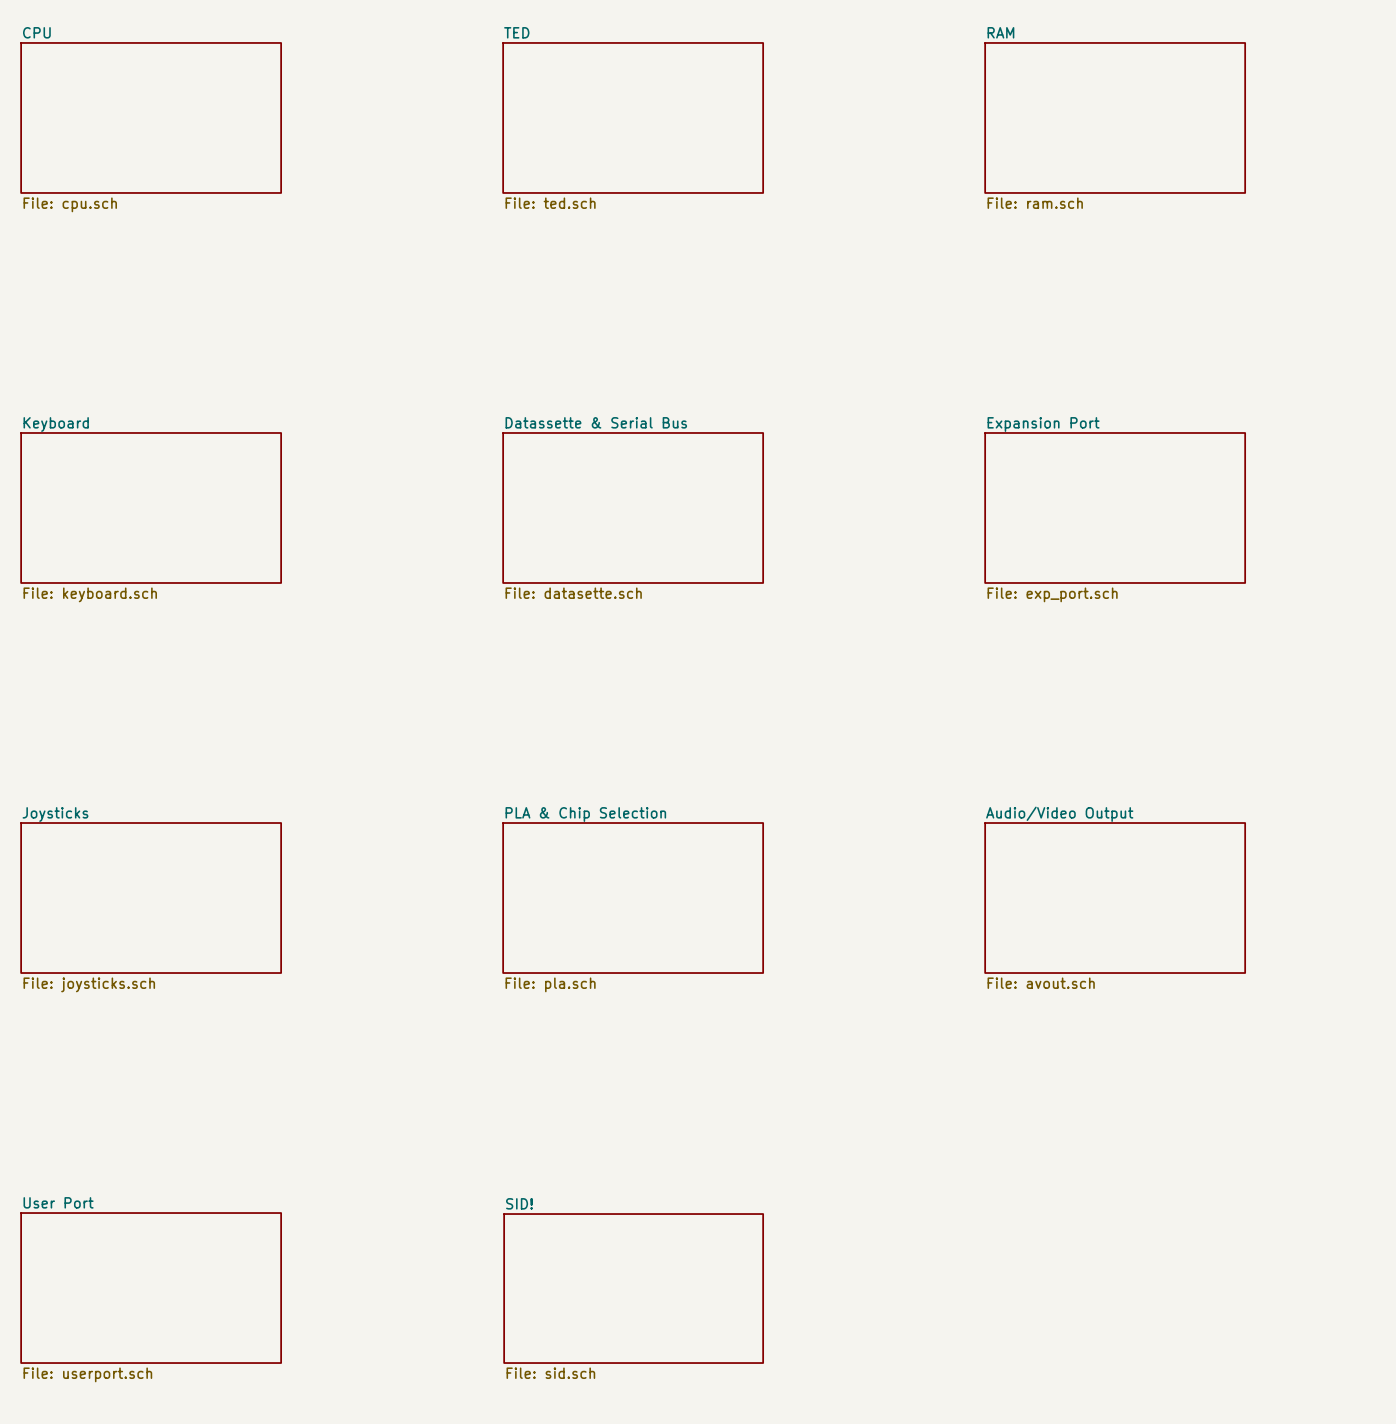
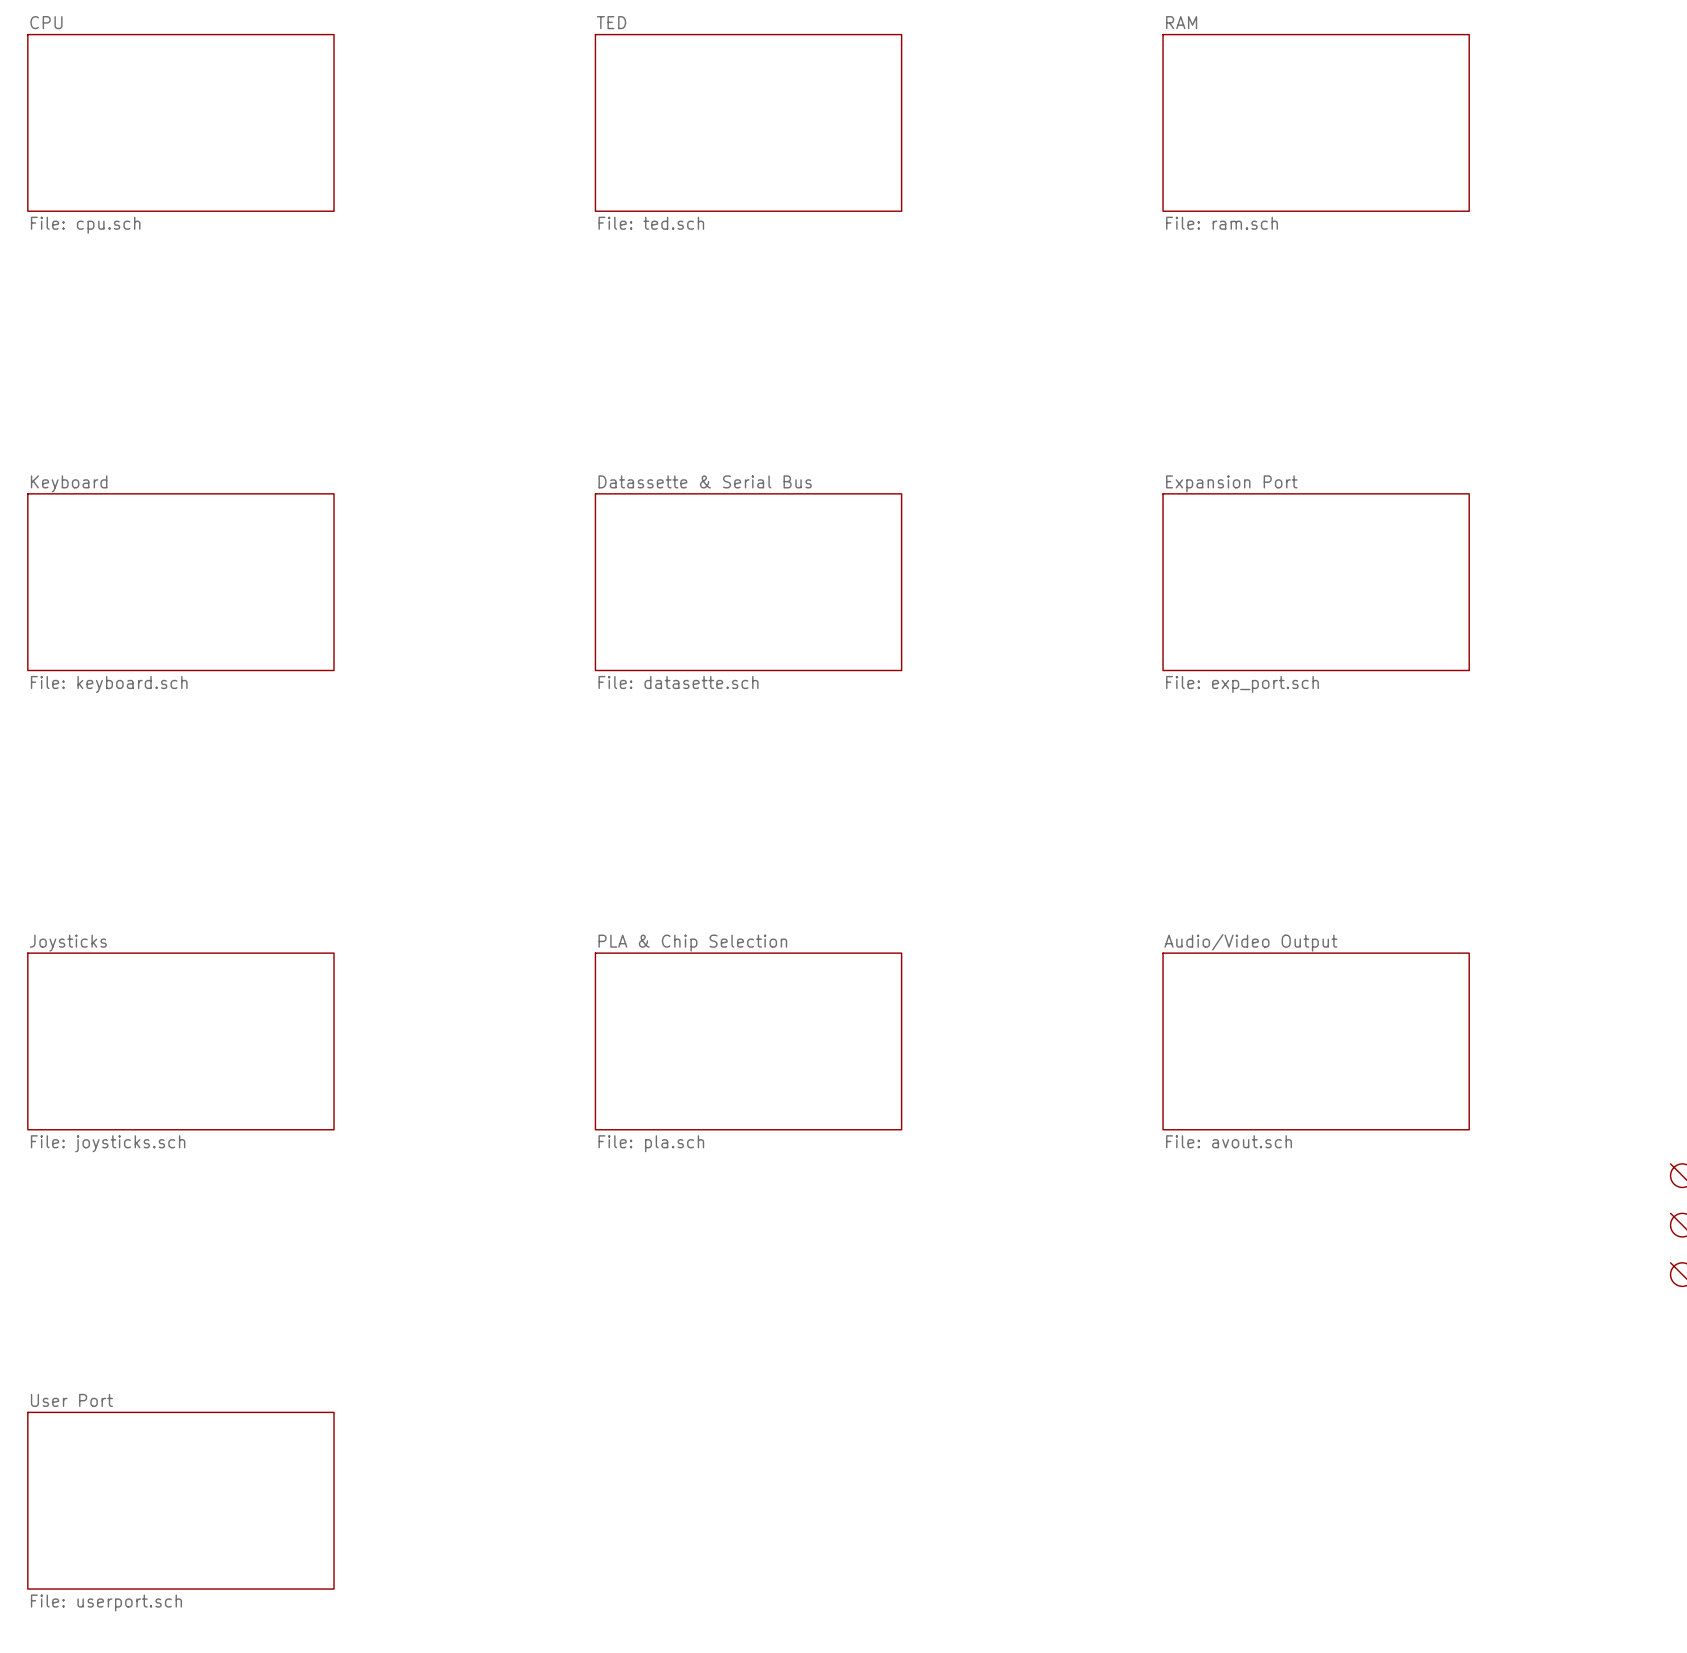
sheet SID!: File: sid.sch (633, 1288) -> none

